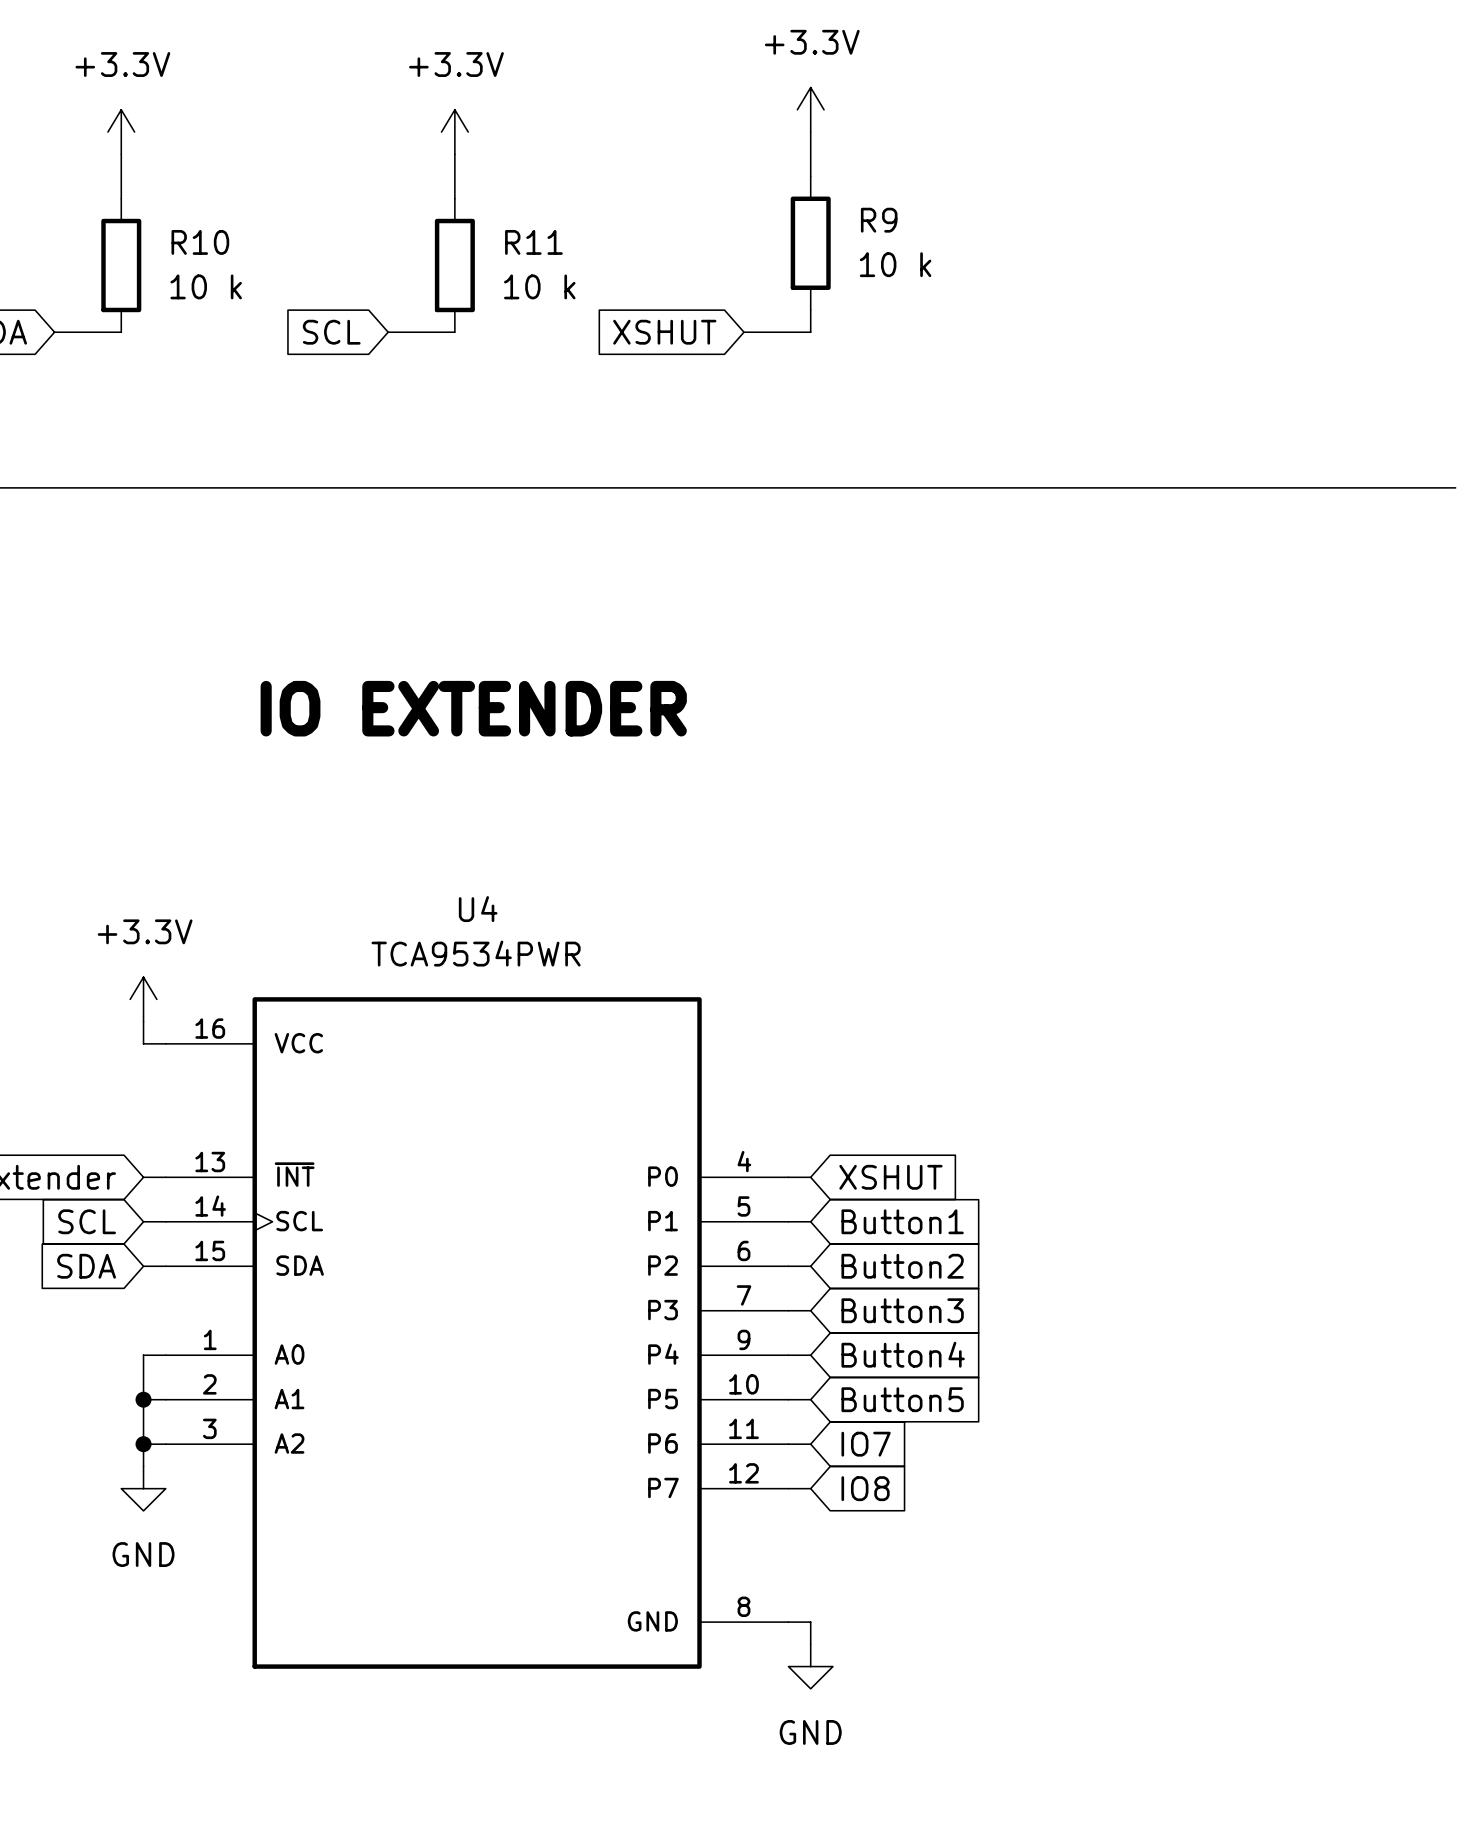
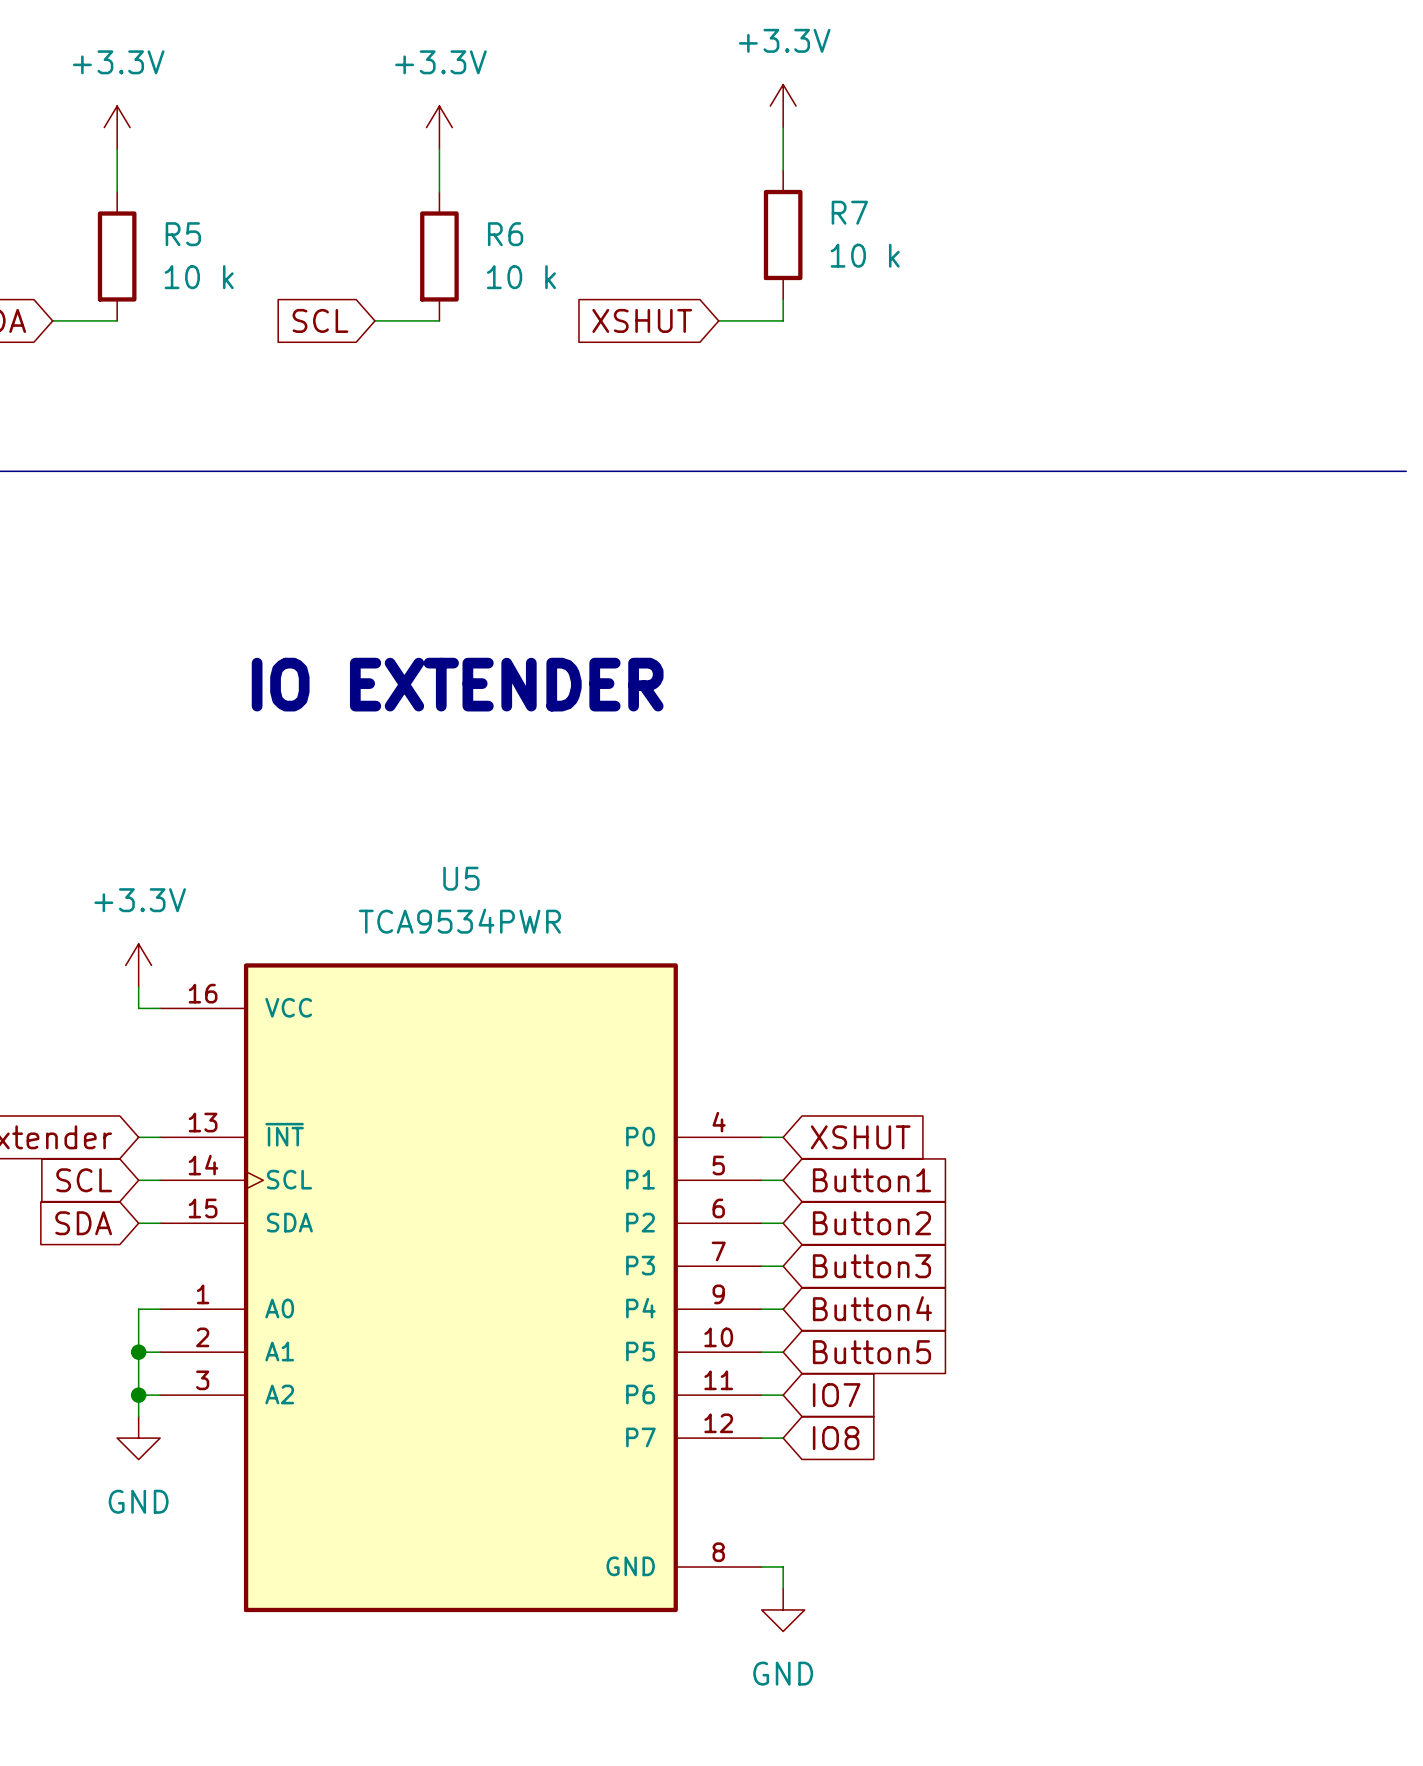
R9 name: R9 (879, 220) -> R7 (849, 212)
R10 name: R10 (200, 242) -> R5 (183, 234)
R11 name: R11 (533, 242) -> R6 (505, 234)
U4 name: U4 (478, 909) -> U5 (461, 878)

